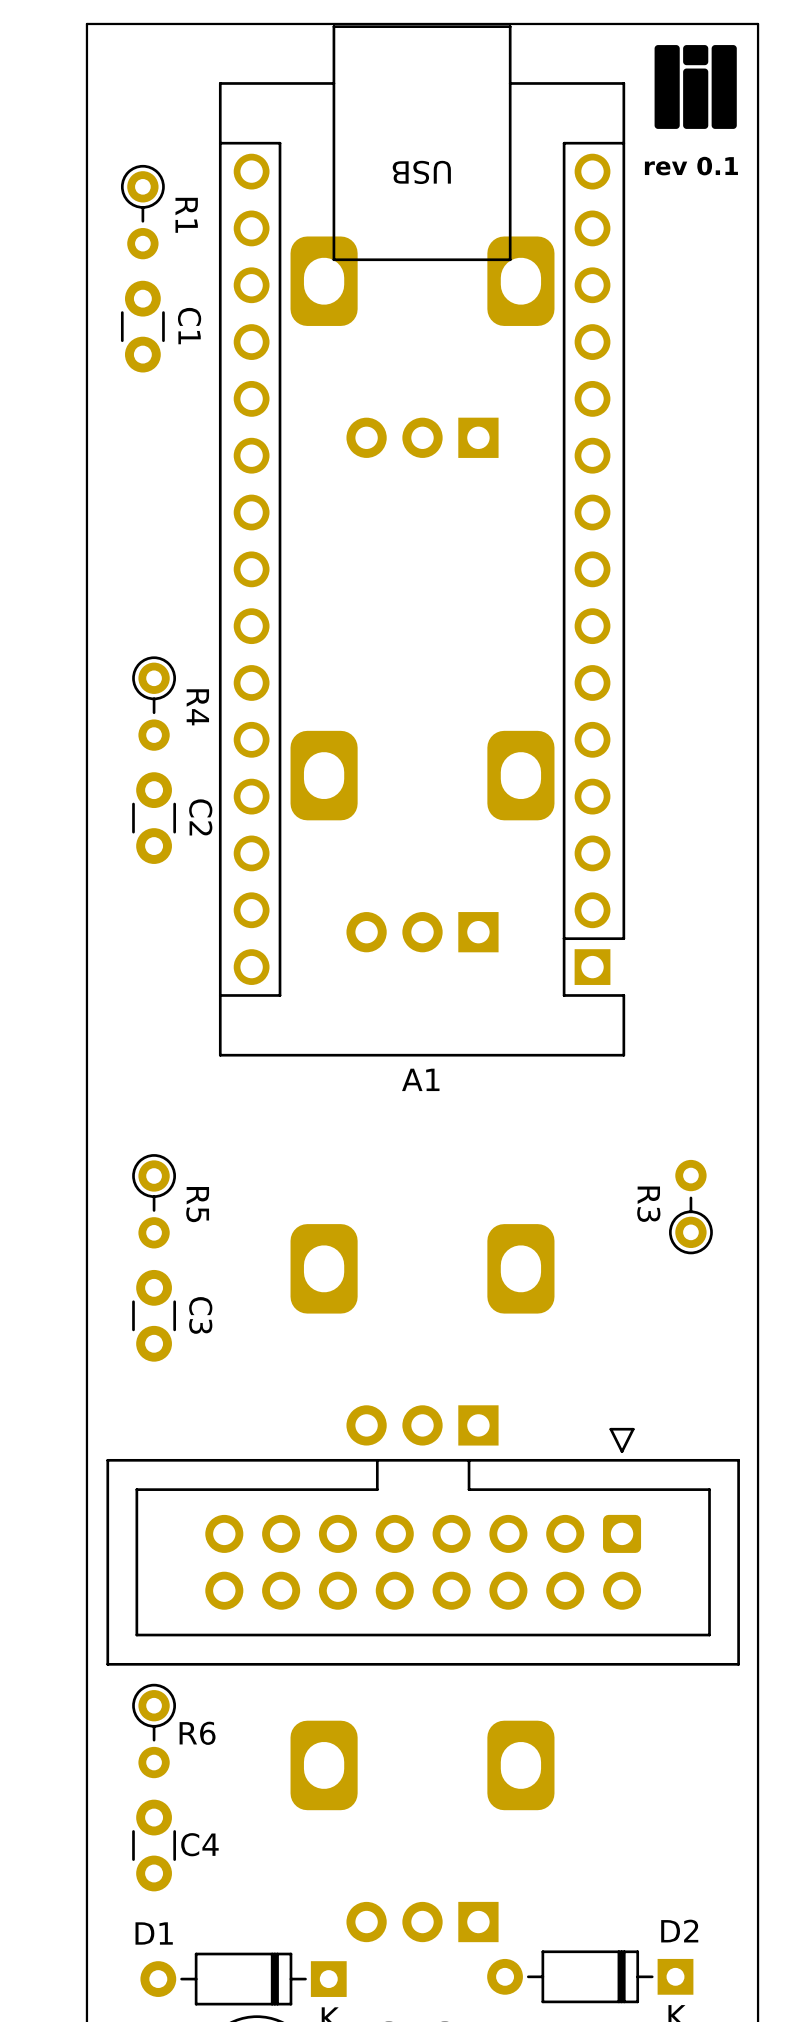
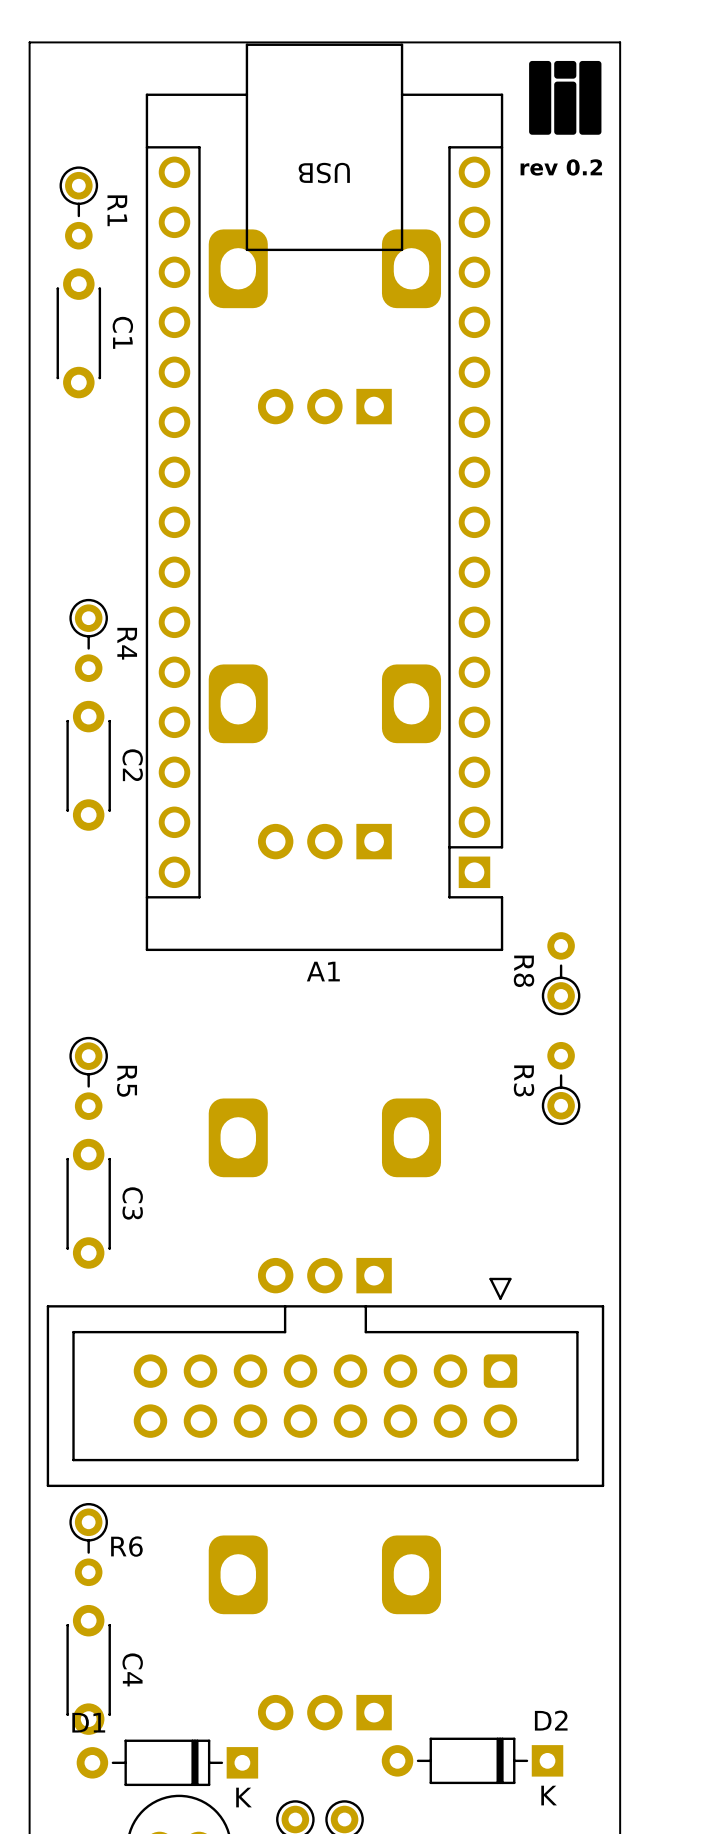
text: rev 0.1 (691, 166) -> rev 0.2 (561, 167)
C1 footprint: [120, 280, 165, 373] -> [56, 268, 102, 399]
C2 footprint: [132, 772, 176, 864] -> [66, 700, 111, 831]
R8: none -> (561, 973)
C3 footprint: [132, 1269, 176, 1362] -> [66, 1138, 111, 1269]
C4 footprint: [132, 1799, 176, 1892] -> [66, 1604, 111, 1735]

